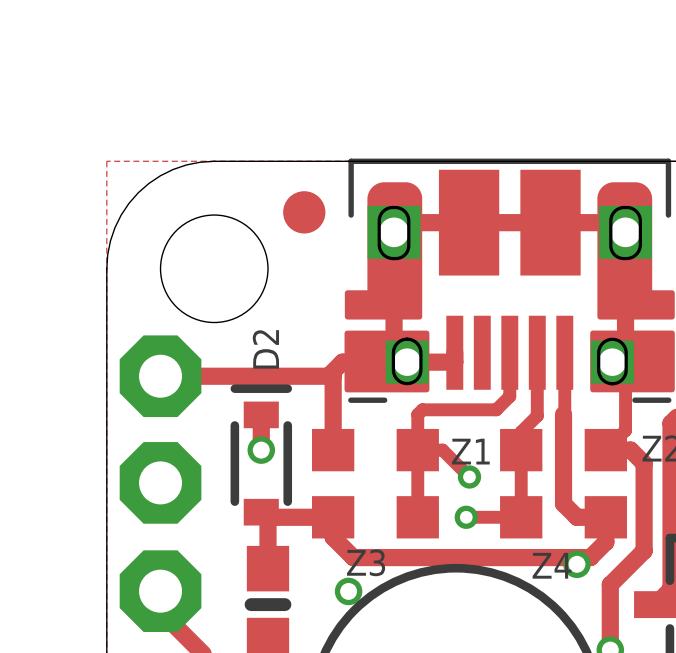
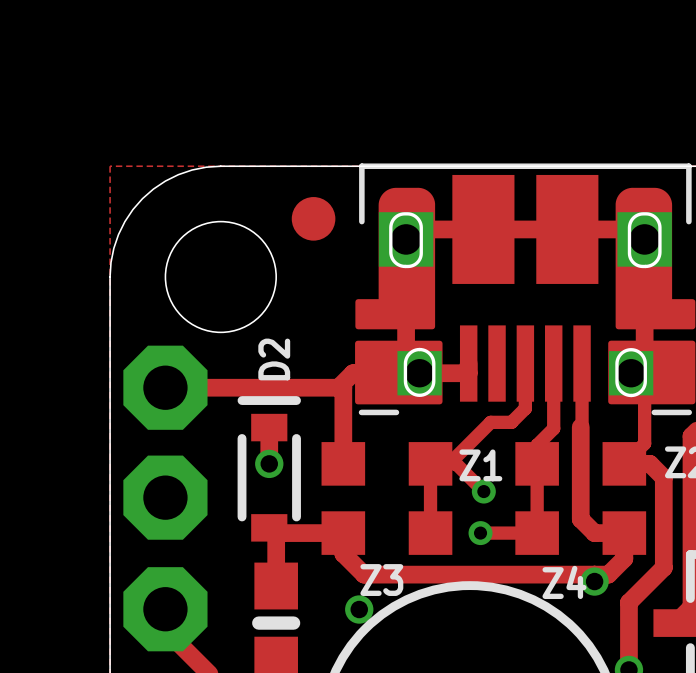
track: (476, 409) (422, 409) (417, 414) (417, 450) -> (490, 422) (449, 463)

